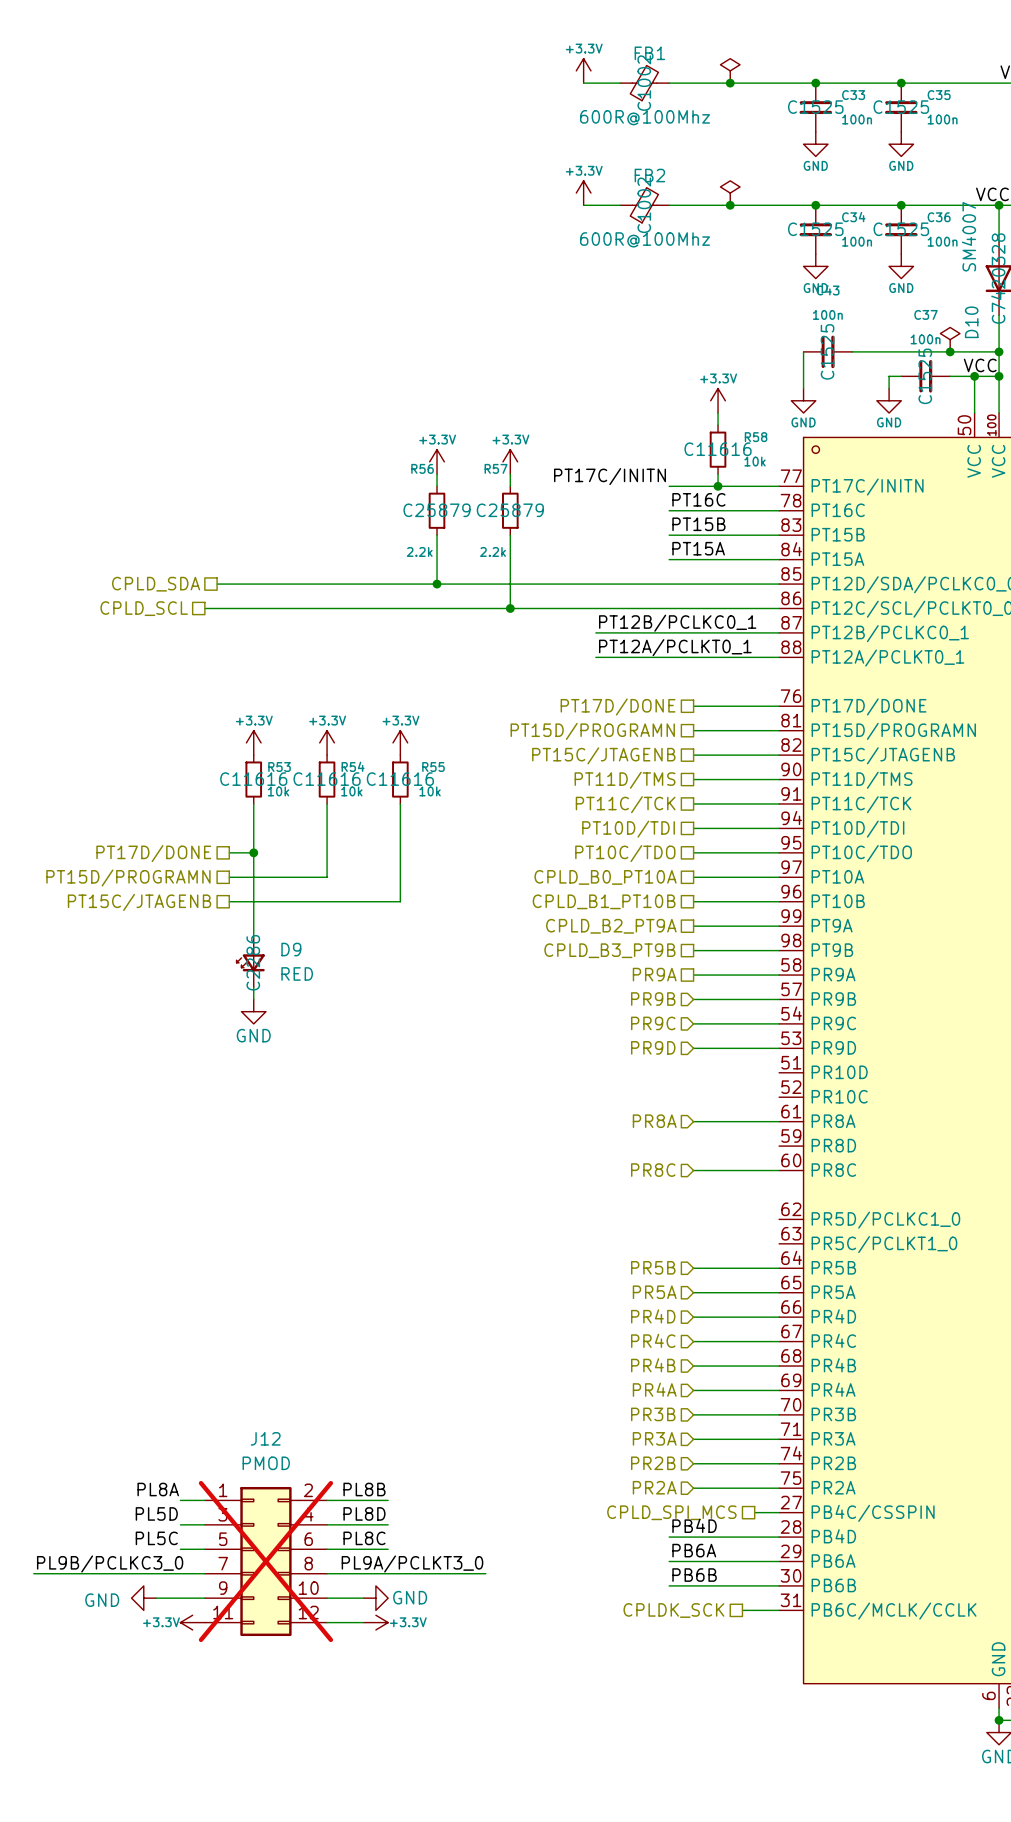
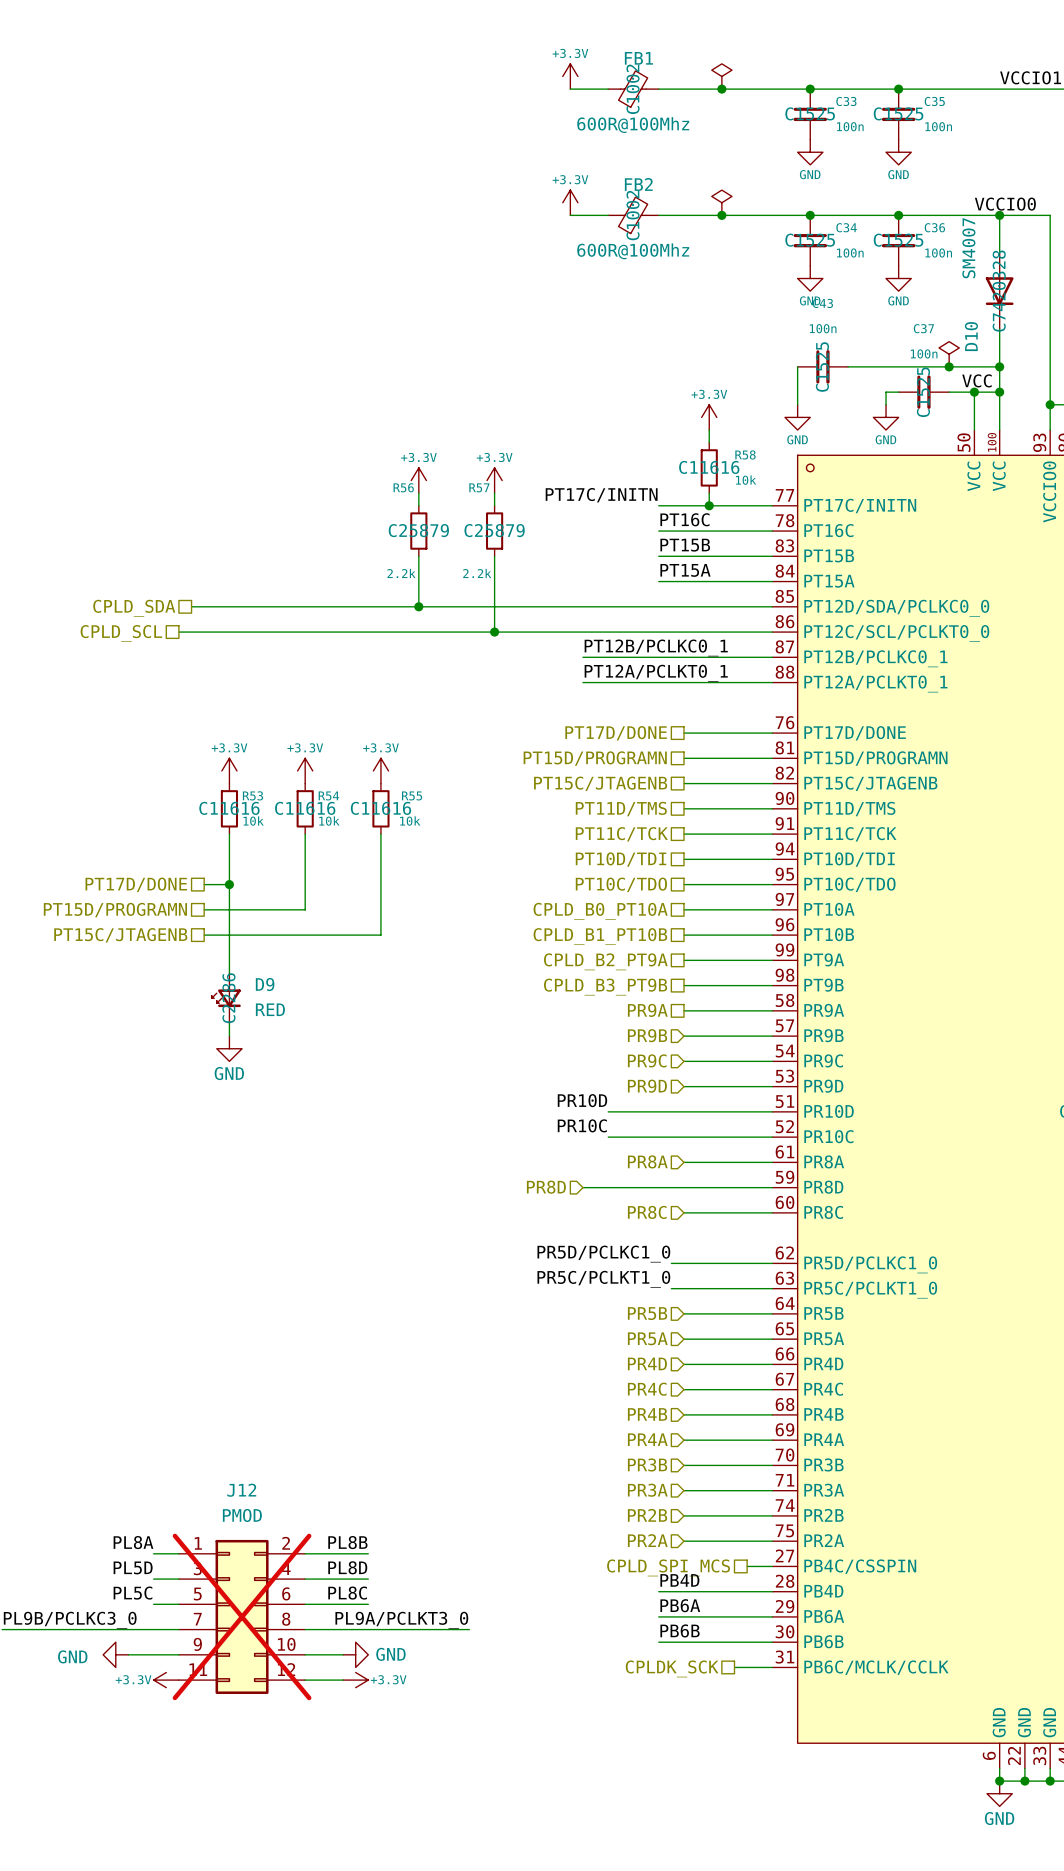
label: none -> PR10D (582, 1100)
wire: none -> (608, 1111) (772, 1111)
label: none -> PR10C (582, 1125)
wire: none -> (608, 1137) (772, 1137)
hierarchical label: none -> PR8D (546, 1187)
wire: none -> (582, 1187) (772, 1187)
label: none -> PR5D/PCLKC1_0 (603, 1254)
wire: none -> (671, 1263) (772, 1263)
label: none -> PR5C/PCLKT1_0 (603, 1279)
wire: none -> (671, 1288) (772, 1288)

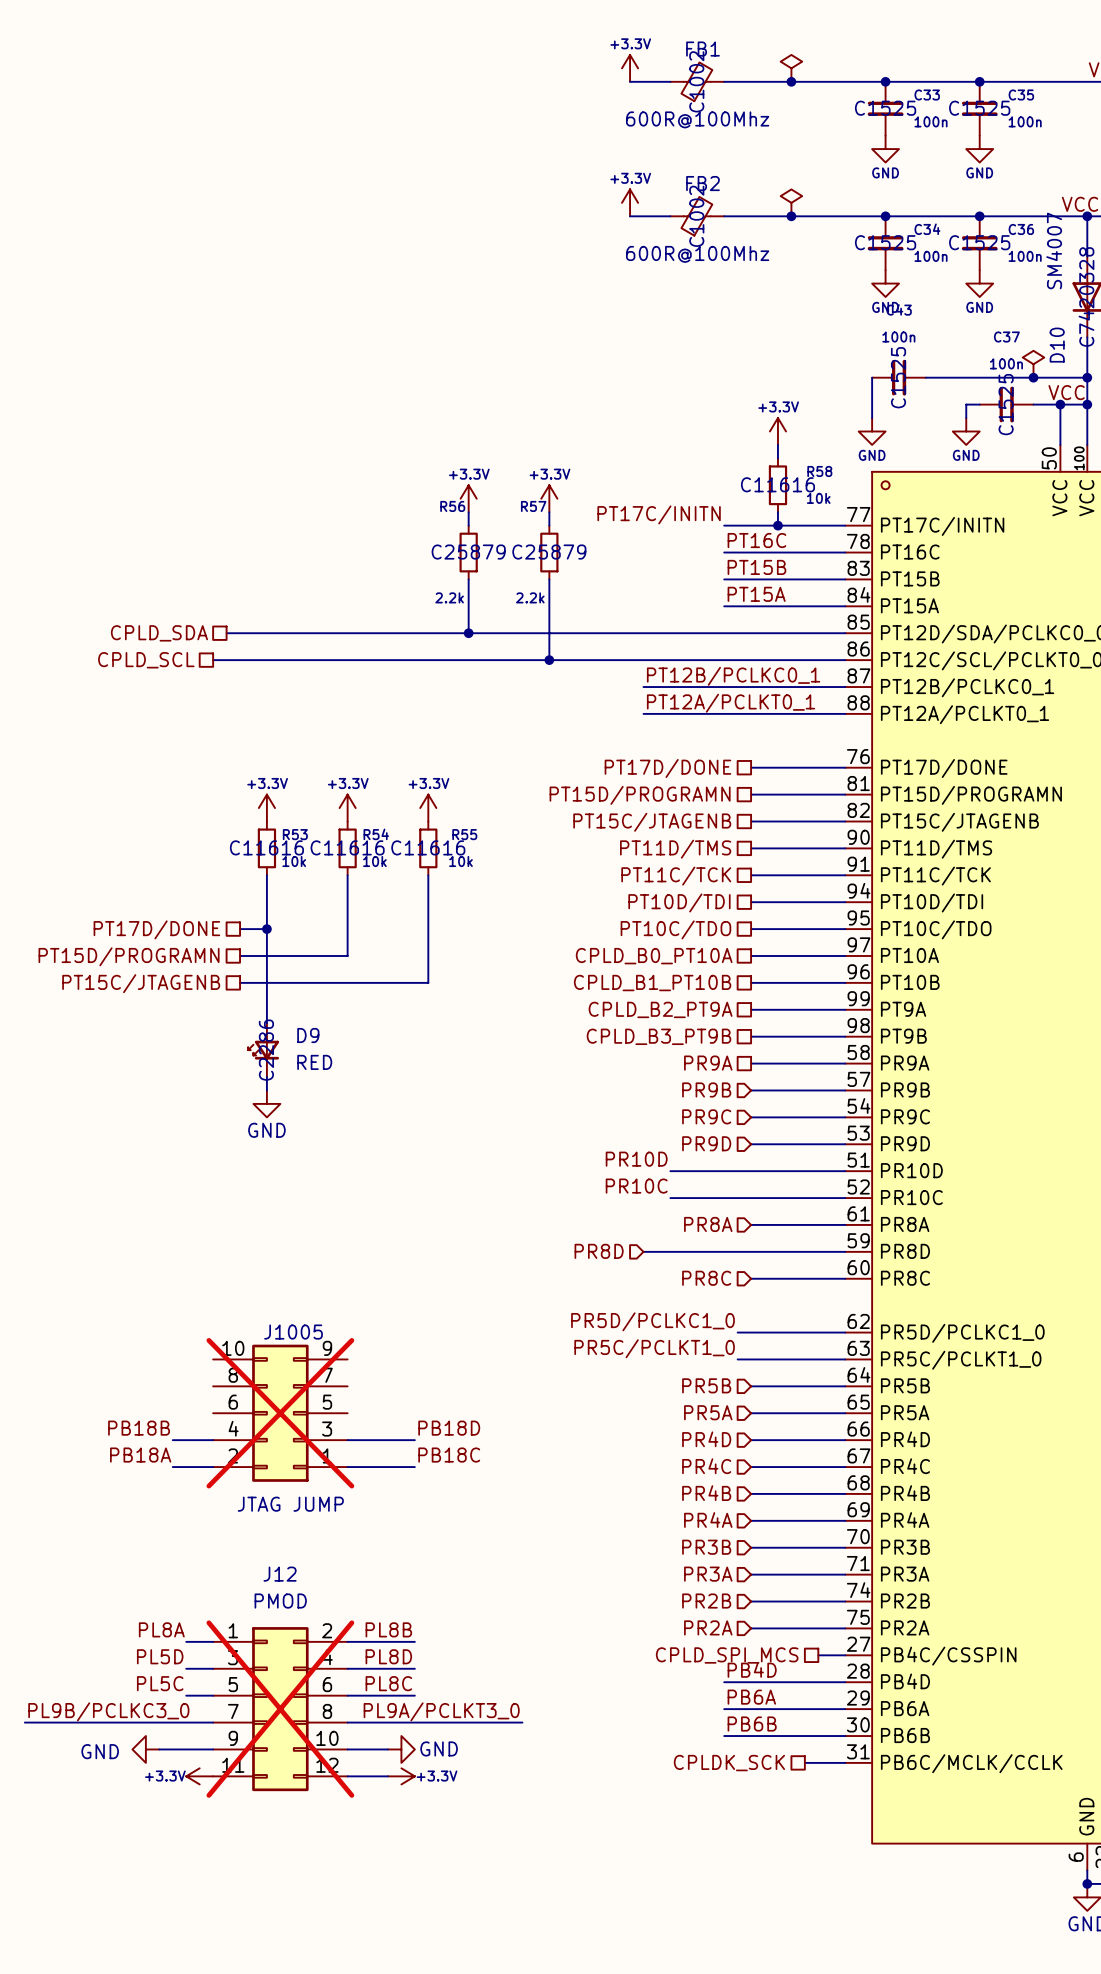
J1005: none -> JTAG JUMP (280, 1413)
label: none -> PB18B (139, 1428)
label: none -> PB18D (449, 1428)
wire: none -> (172, 1440) (213, 1440)
wire: none -> (347, 1440) (414, 1440)
label: none -> PB18A (140, 1455)
label: none -> PB18C (449, 1455)
wire: none -> (172, 1467) (213, 1467)
wire: none -> (347, 1467) (414, 1467)

